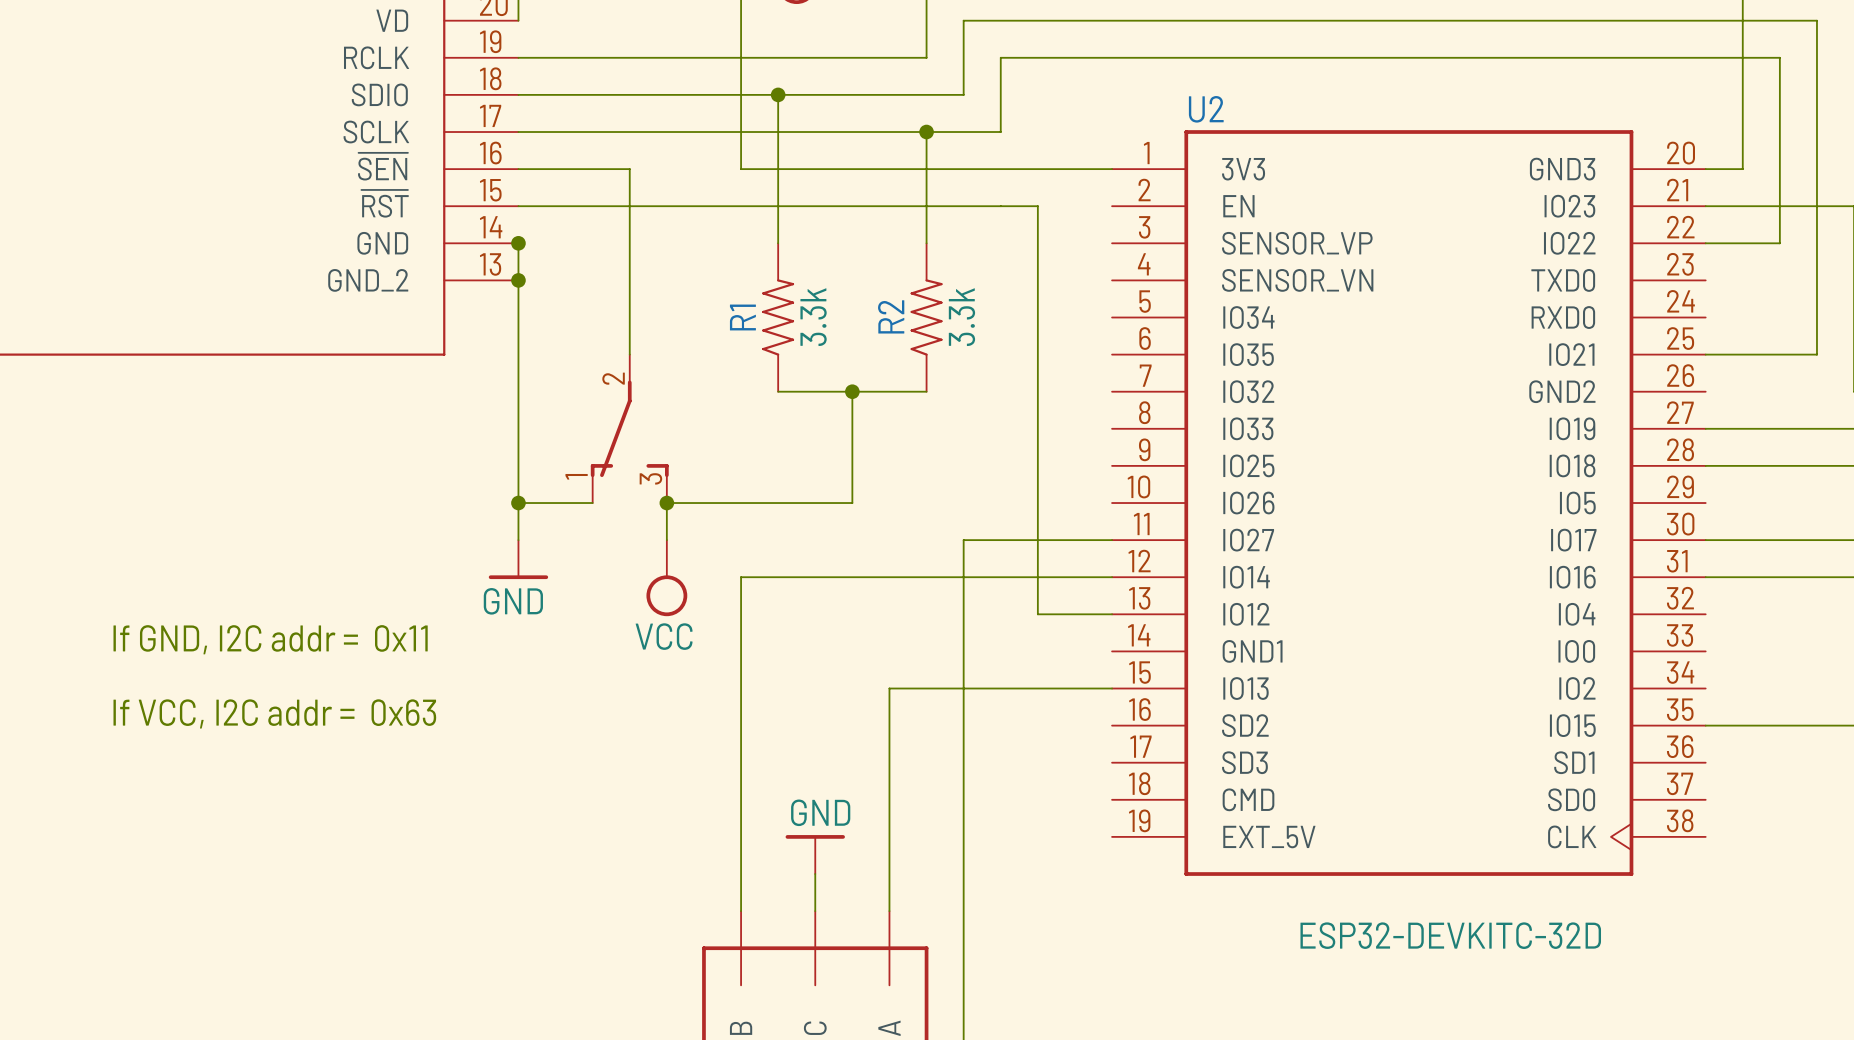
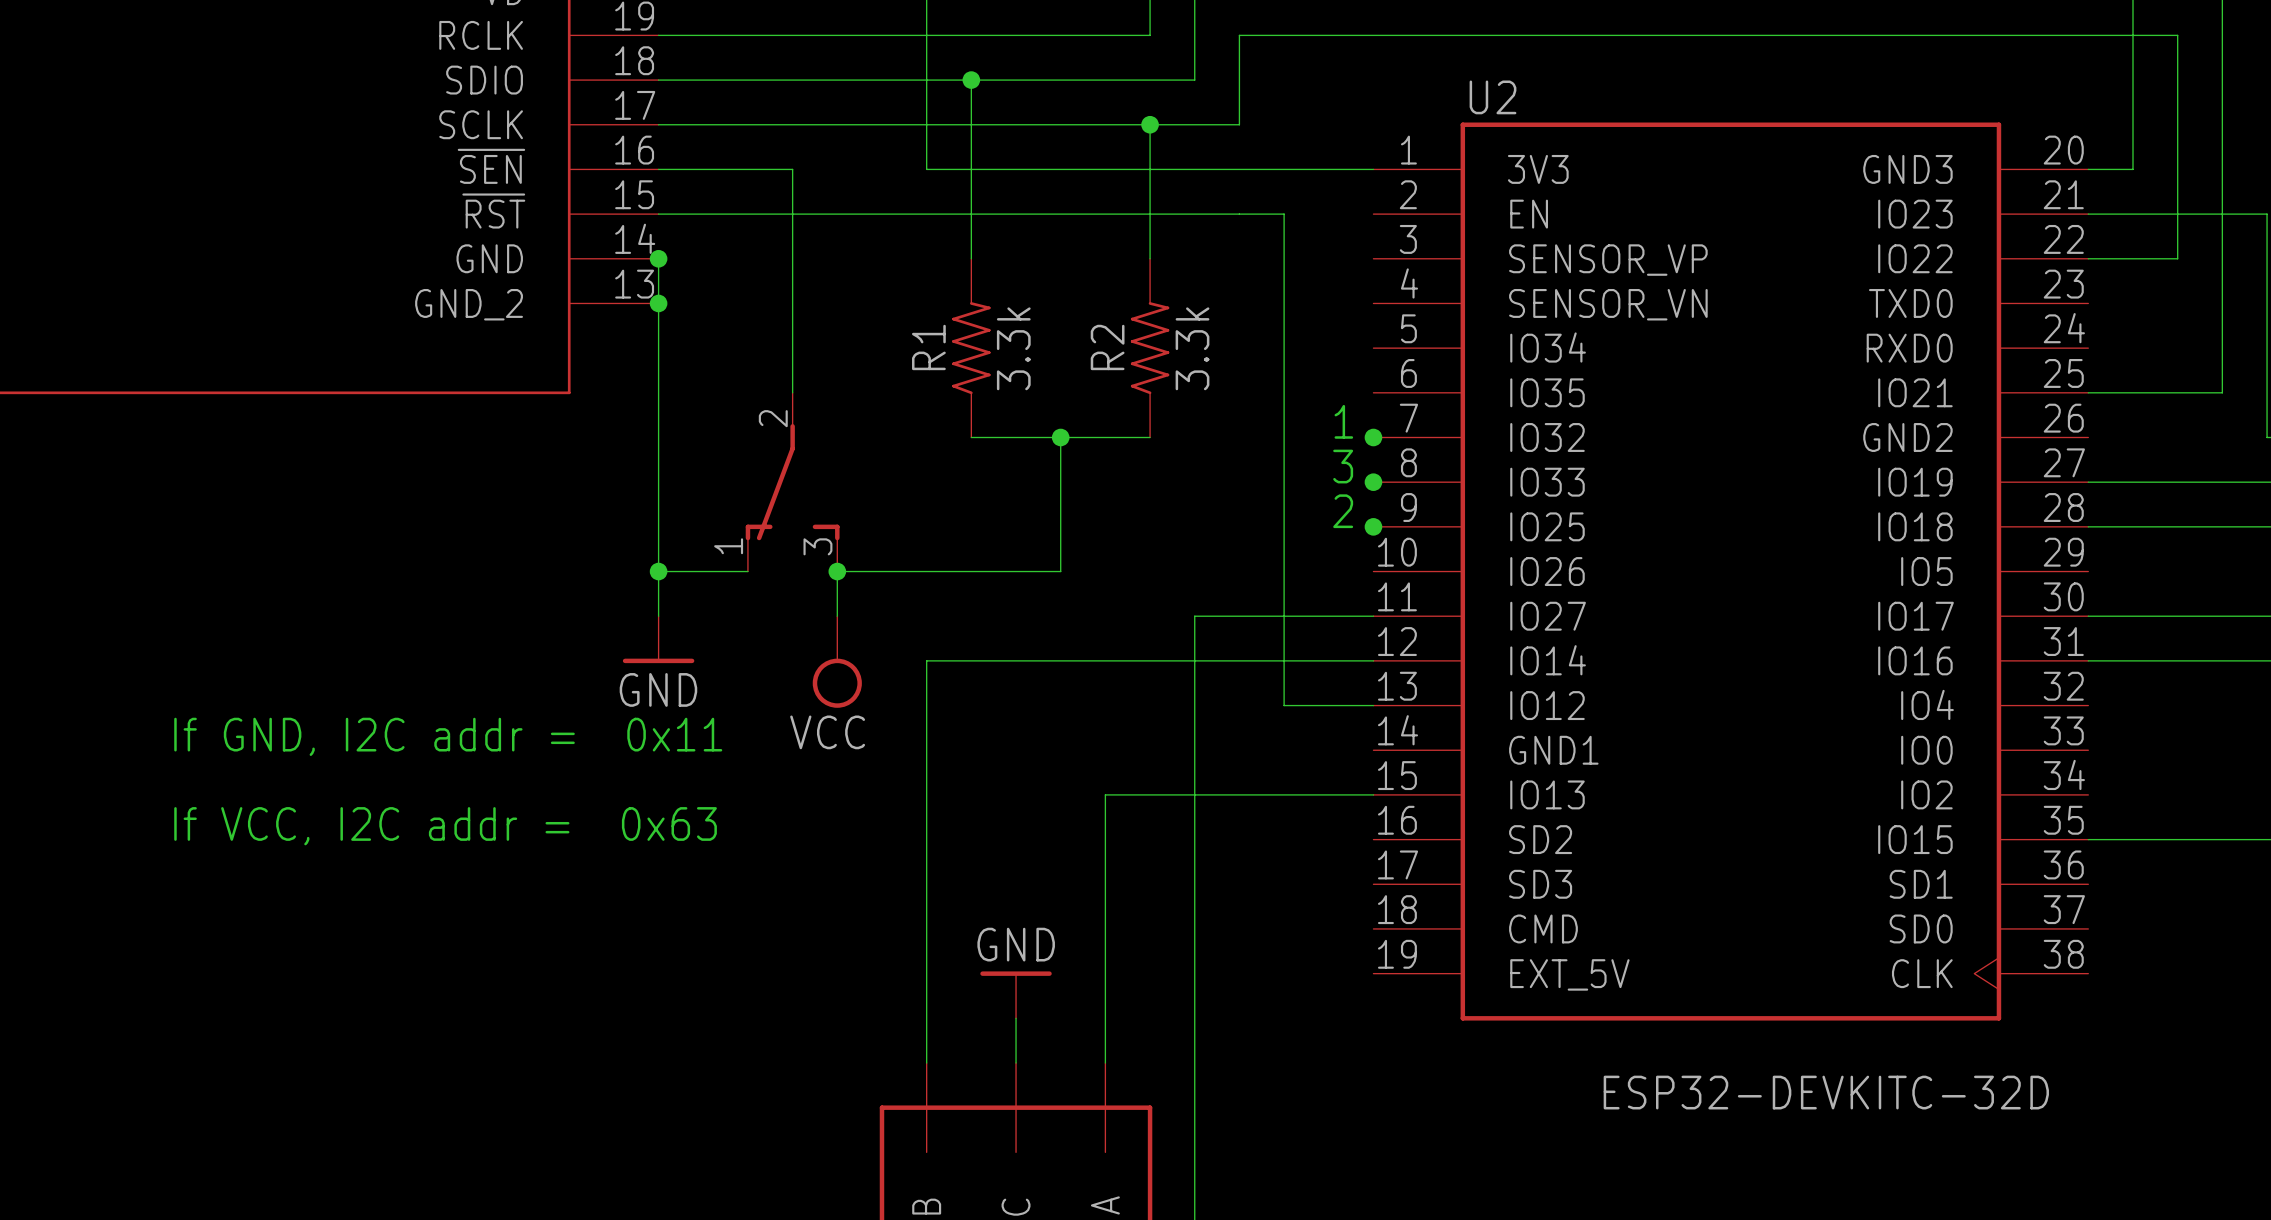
text: none -> 1 (1343, 421)
junction: none -> (1373, 437)
text: none -> 3 (1343, 466)
junction: none -> (1373, 482)
text: none -> 2 (1343, 511)
junction: none -> (1373, 526)

